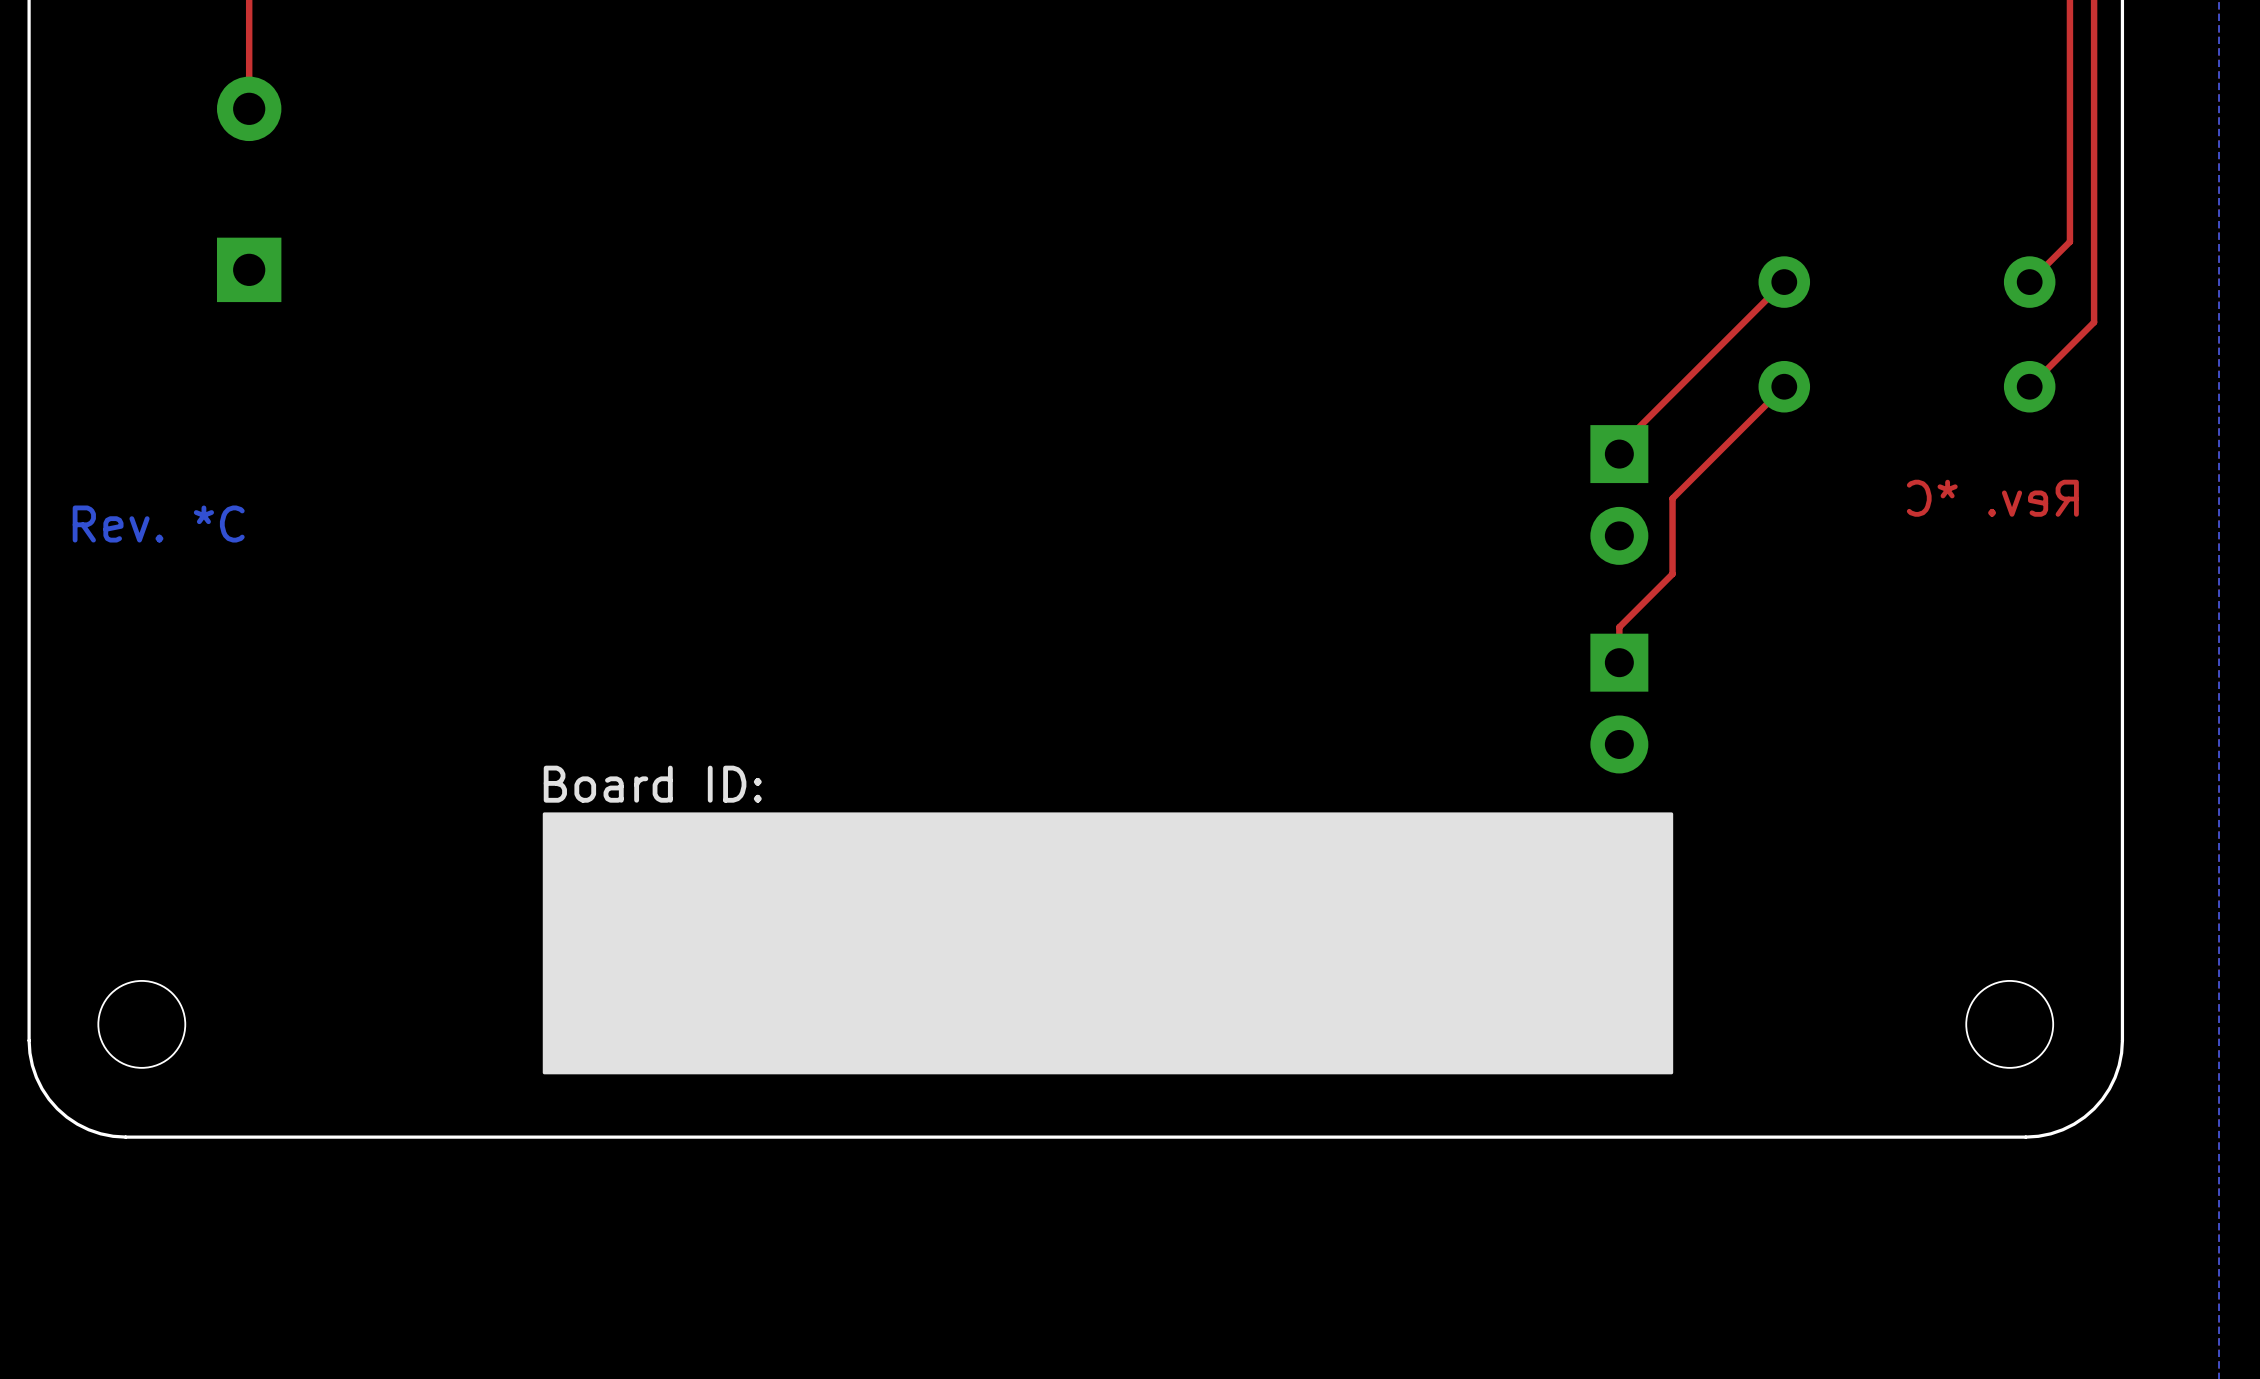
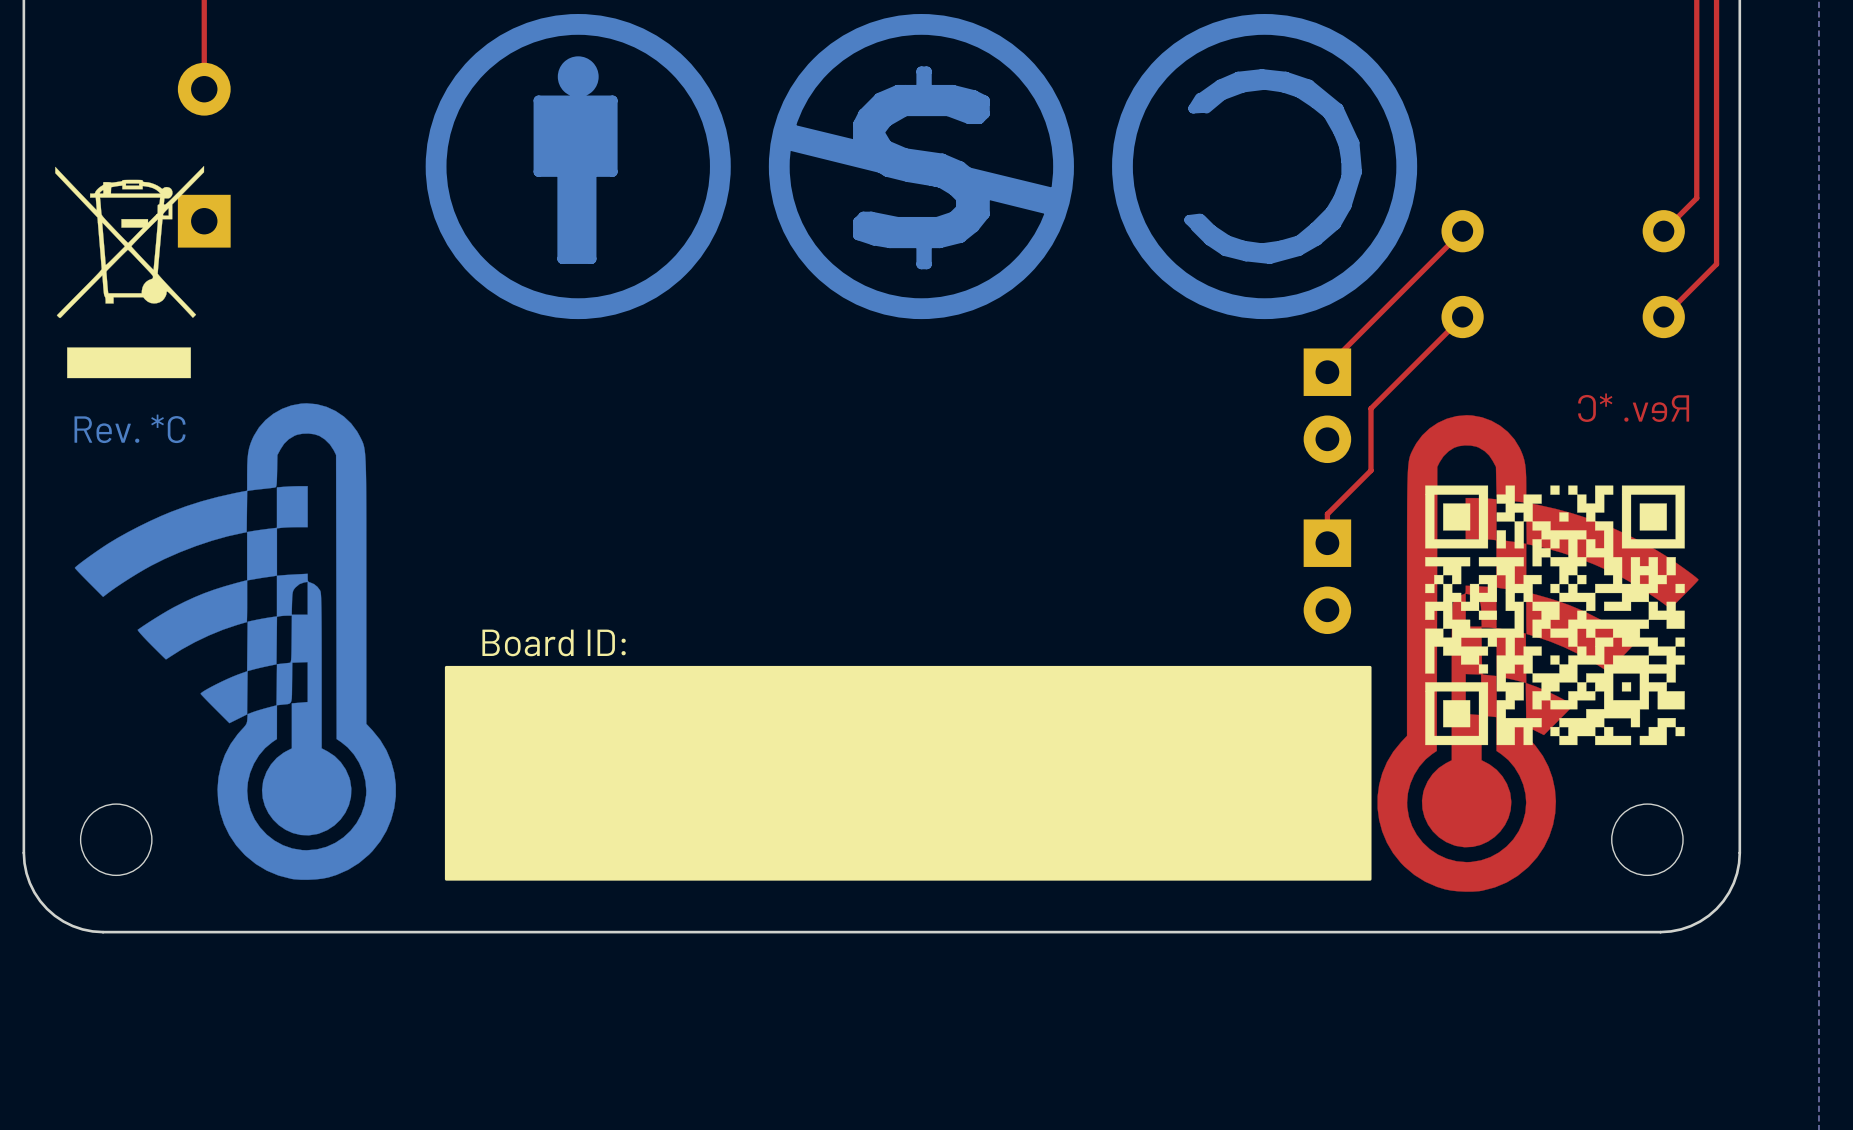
drawing: none -> [425, 13, 731, 320]
drawing: none -> [768, 13, 1074, 320]
drawing: none -> [1112, 13, 1418, 320]
drawing: none -> [55, 165, 396, 880]
drawing: none -> [1377, 415, 1699, 892]

